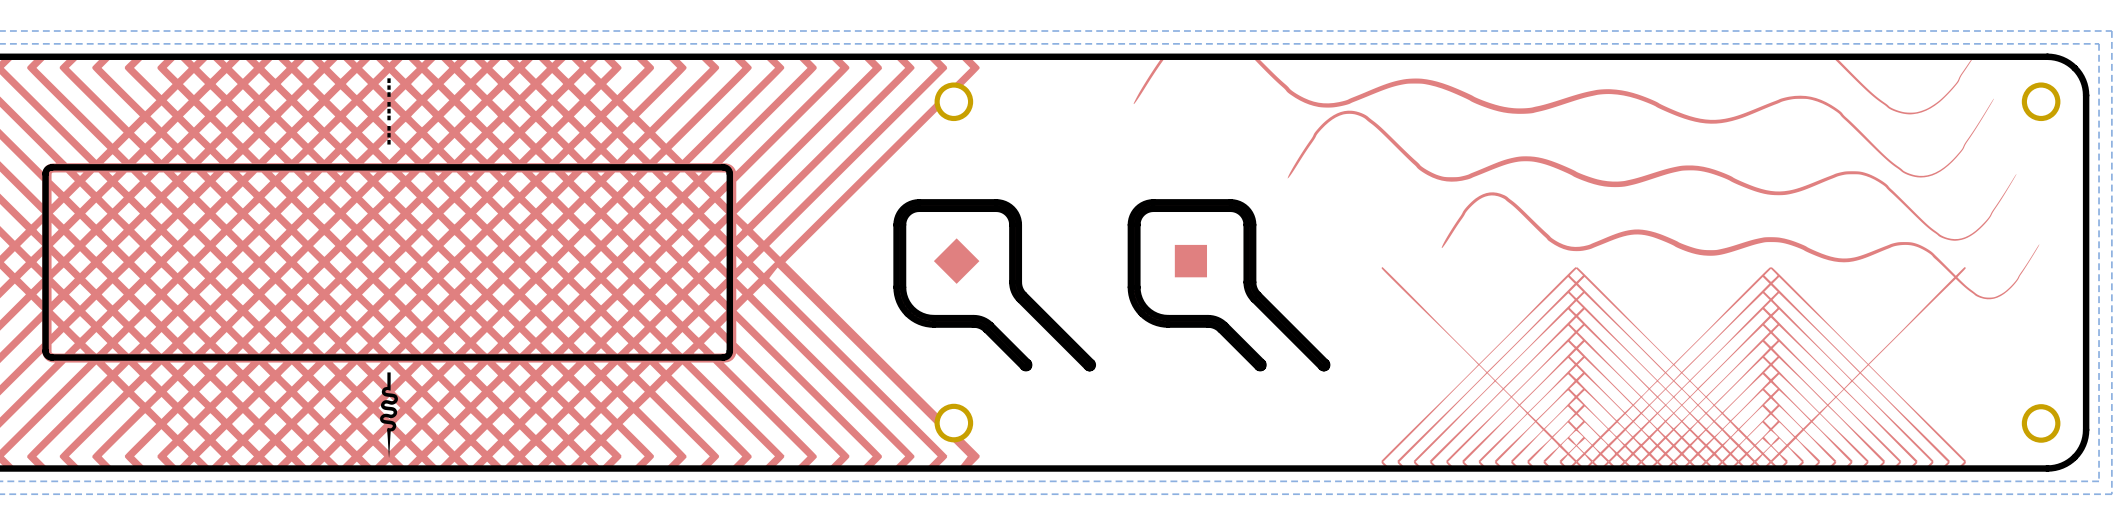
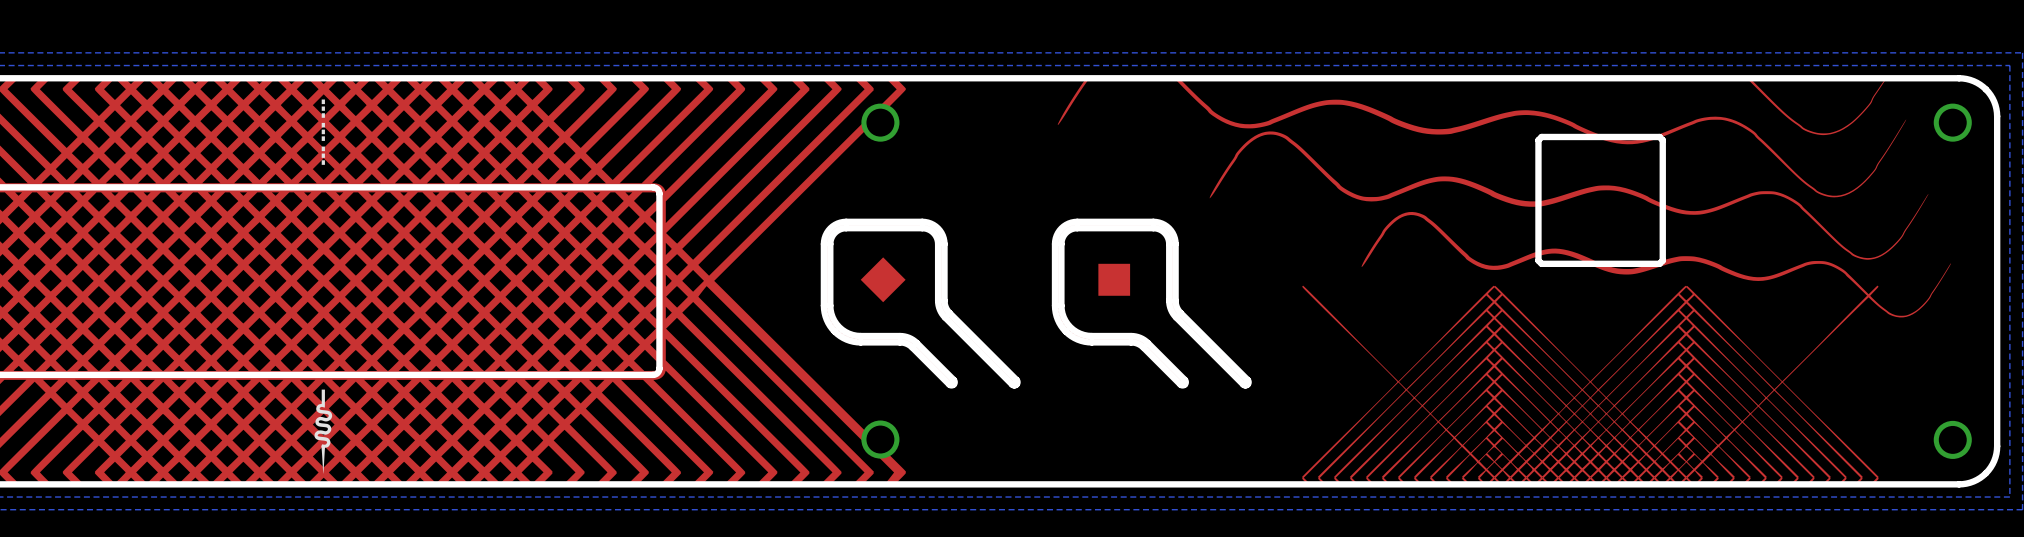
board edge: none -> (1541, 136) (1659, 136) (1662, 140) (1662, 260) (1659, 263) (1541, 263) (1538, 260) (1538, 140) (1541, 136)

